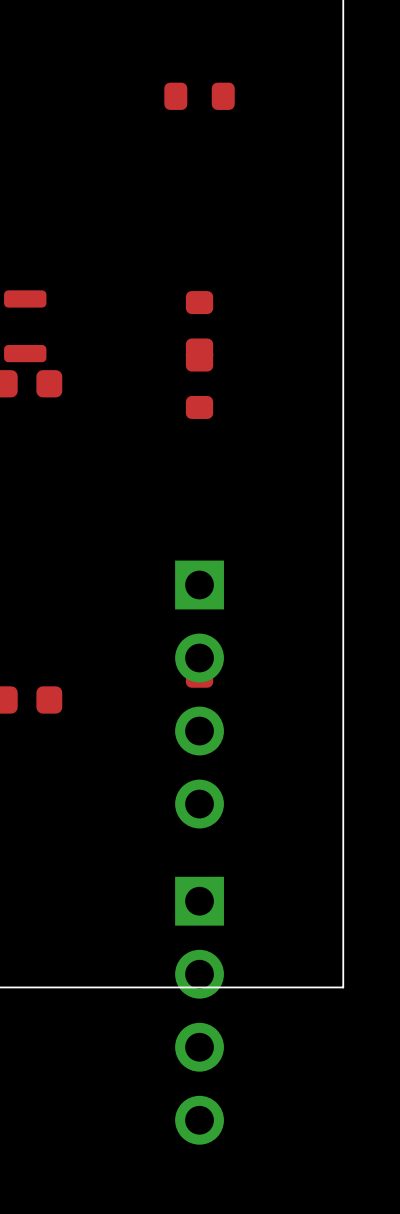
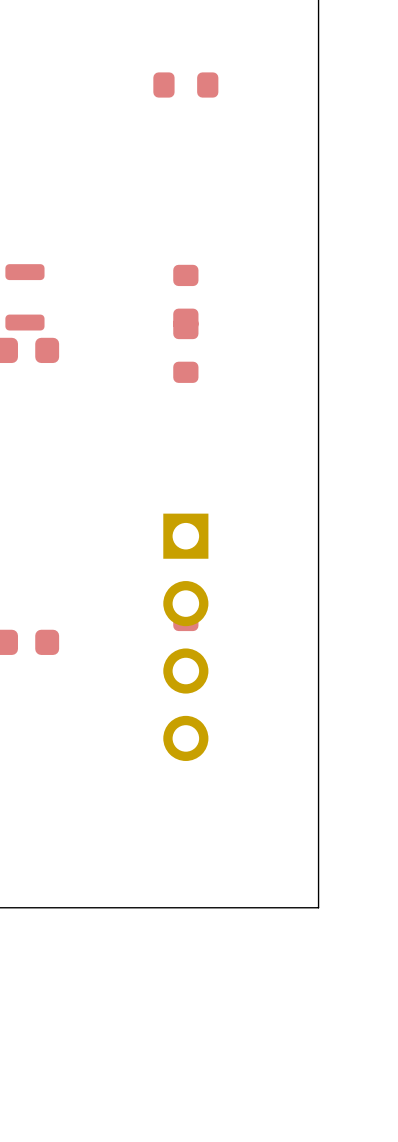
part: (199, 1010) -> none

